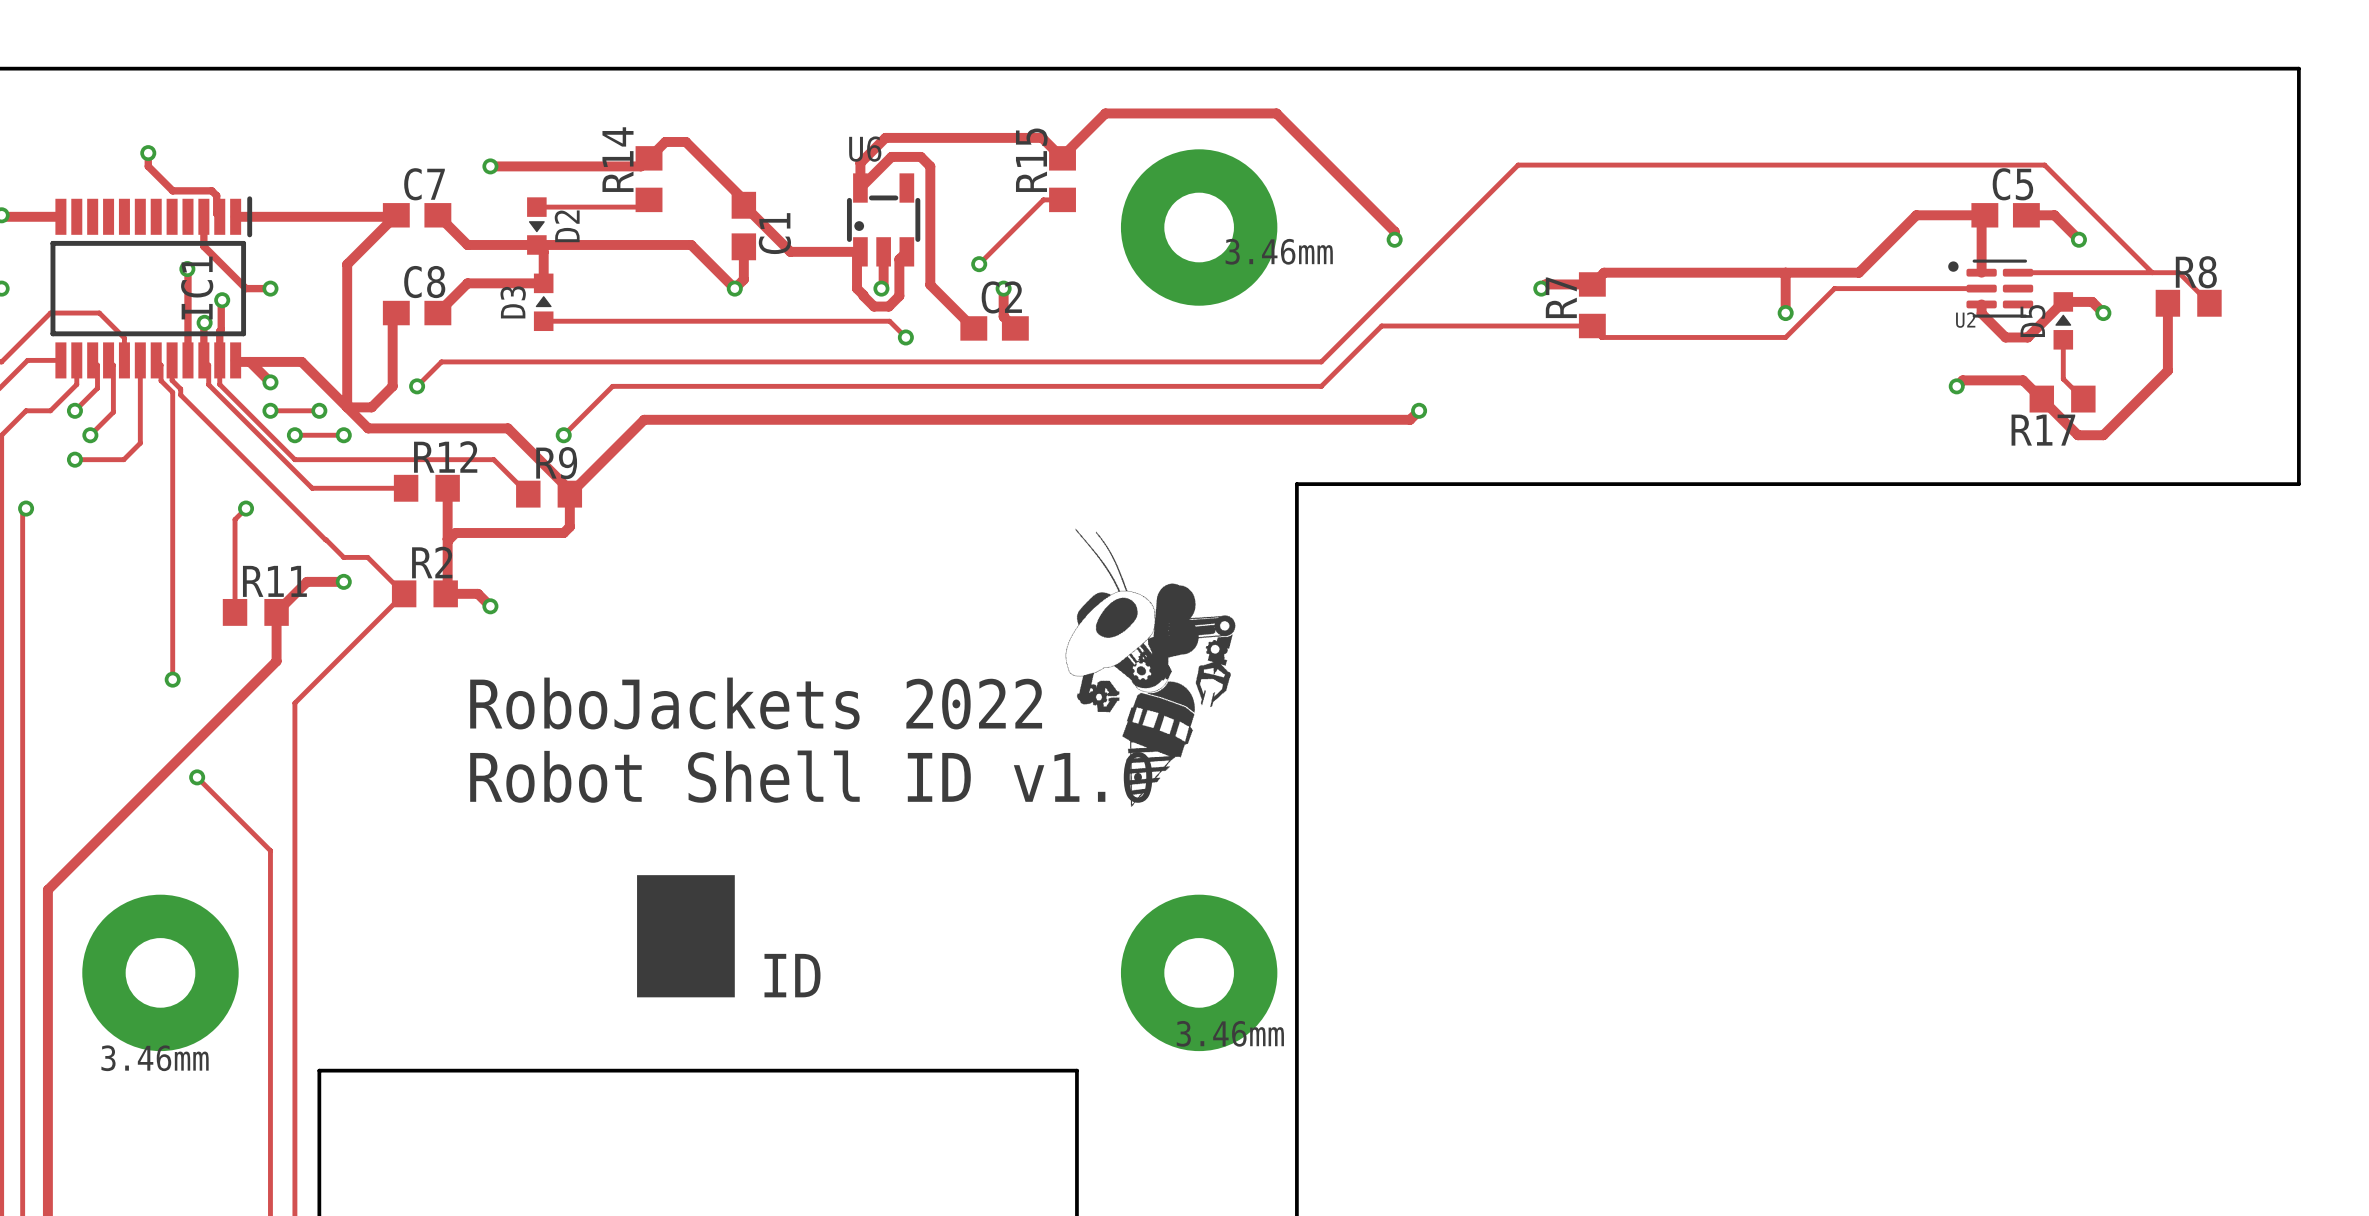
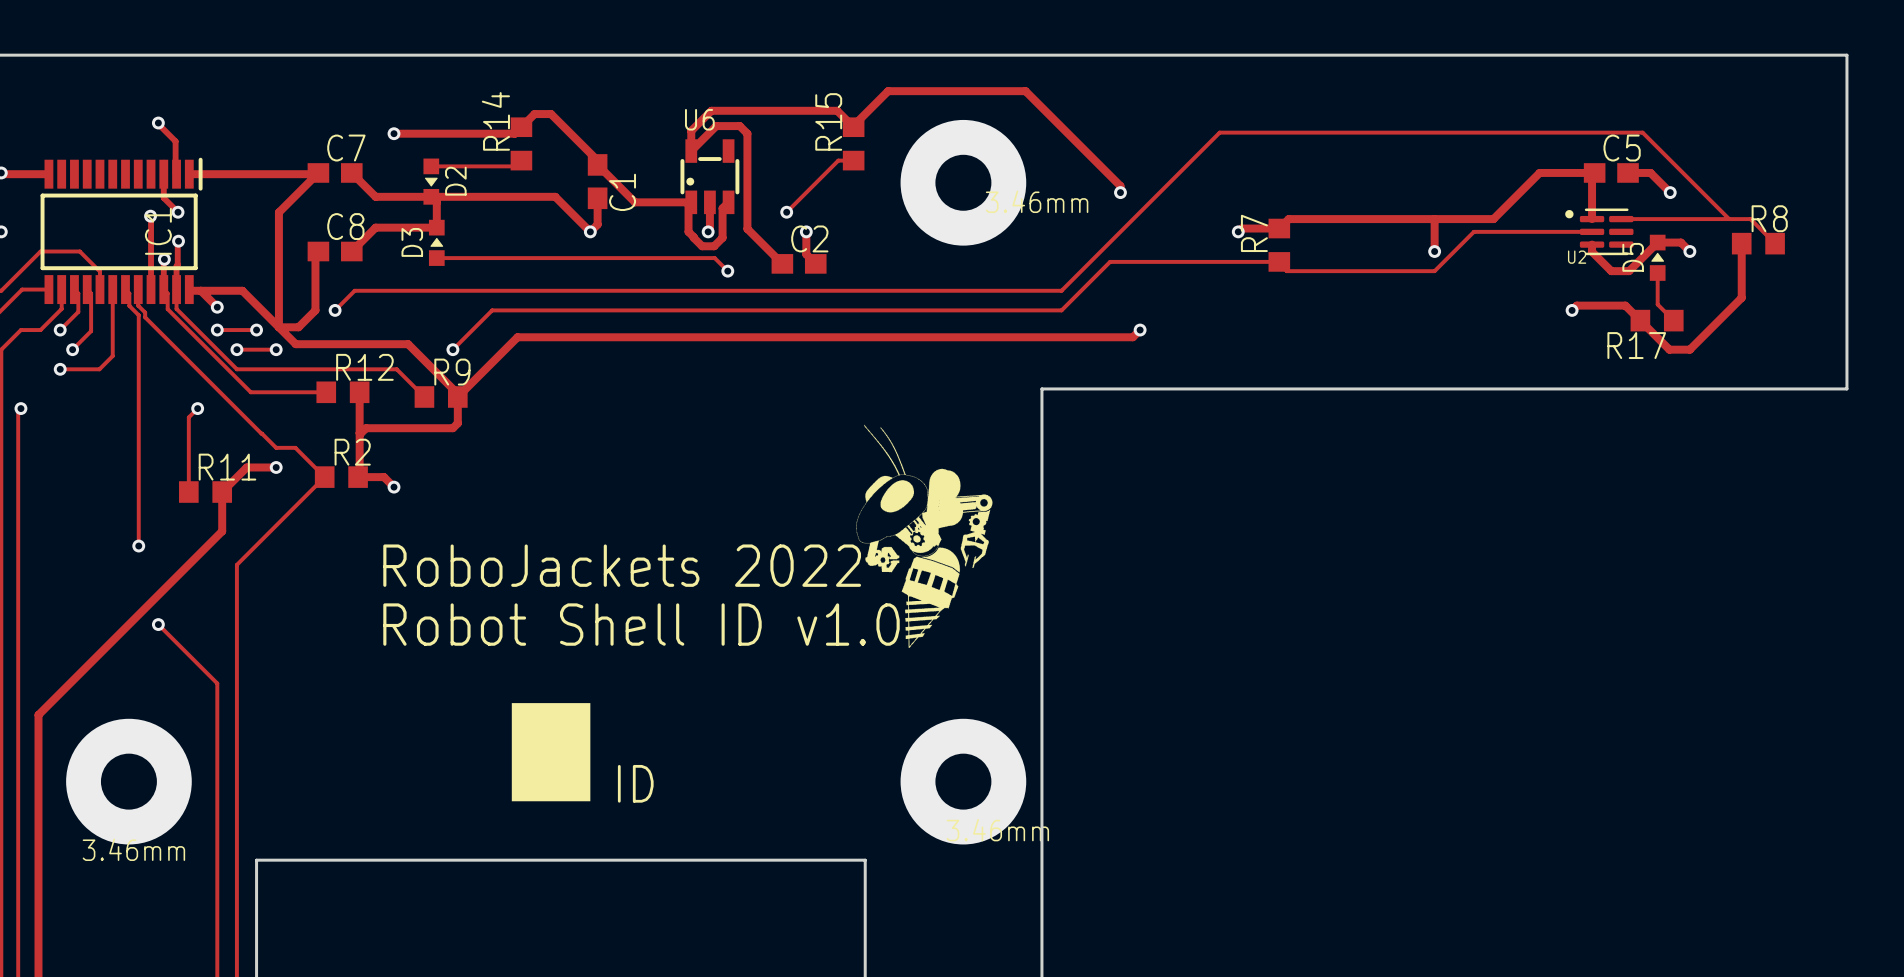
track: (148, 153) (148, 166) (172, 190) (211, 190) (216, 195) (216, 213) (218, 215) -> (158, 123) (175, 141) (175, 173)
via position: (148, 153) -> (158, 123)
track: (221, 264) (246, 288) (270, 288) -> none
via position: (270, 288) -> (178, 212)

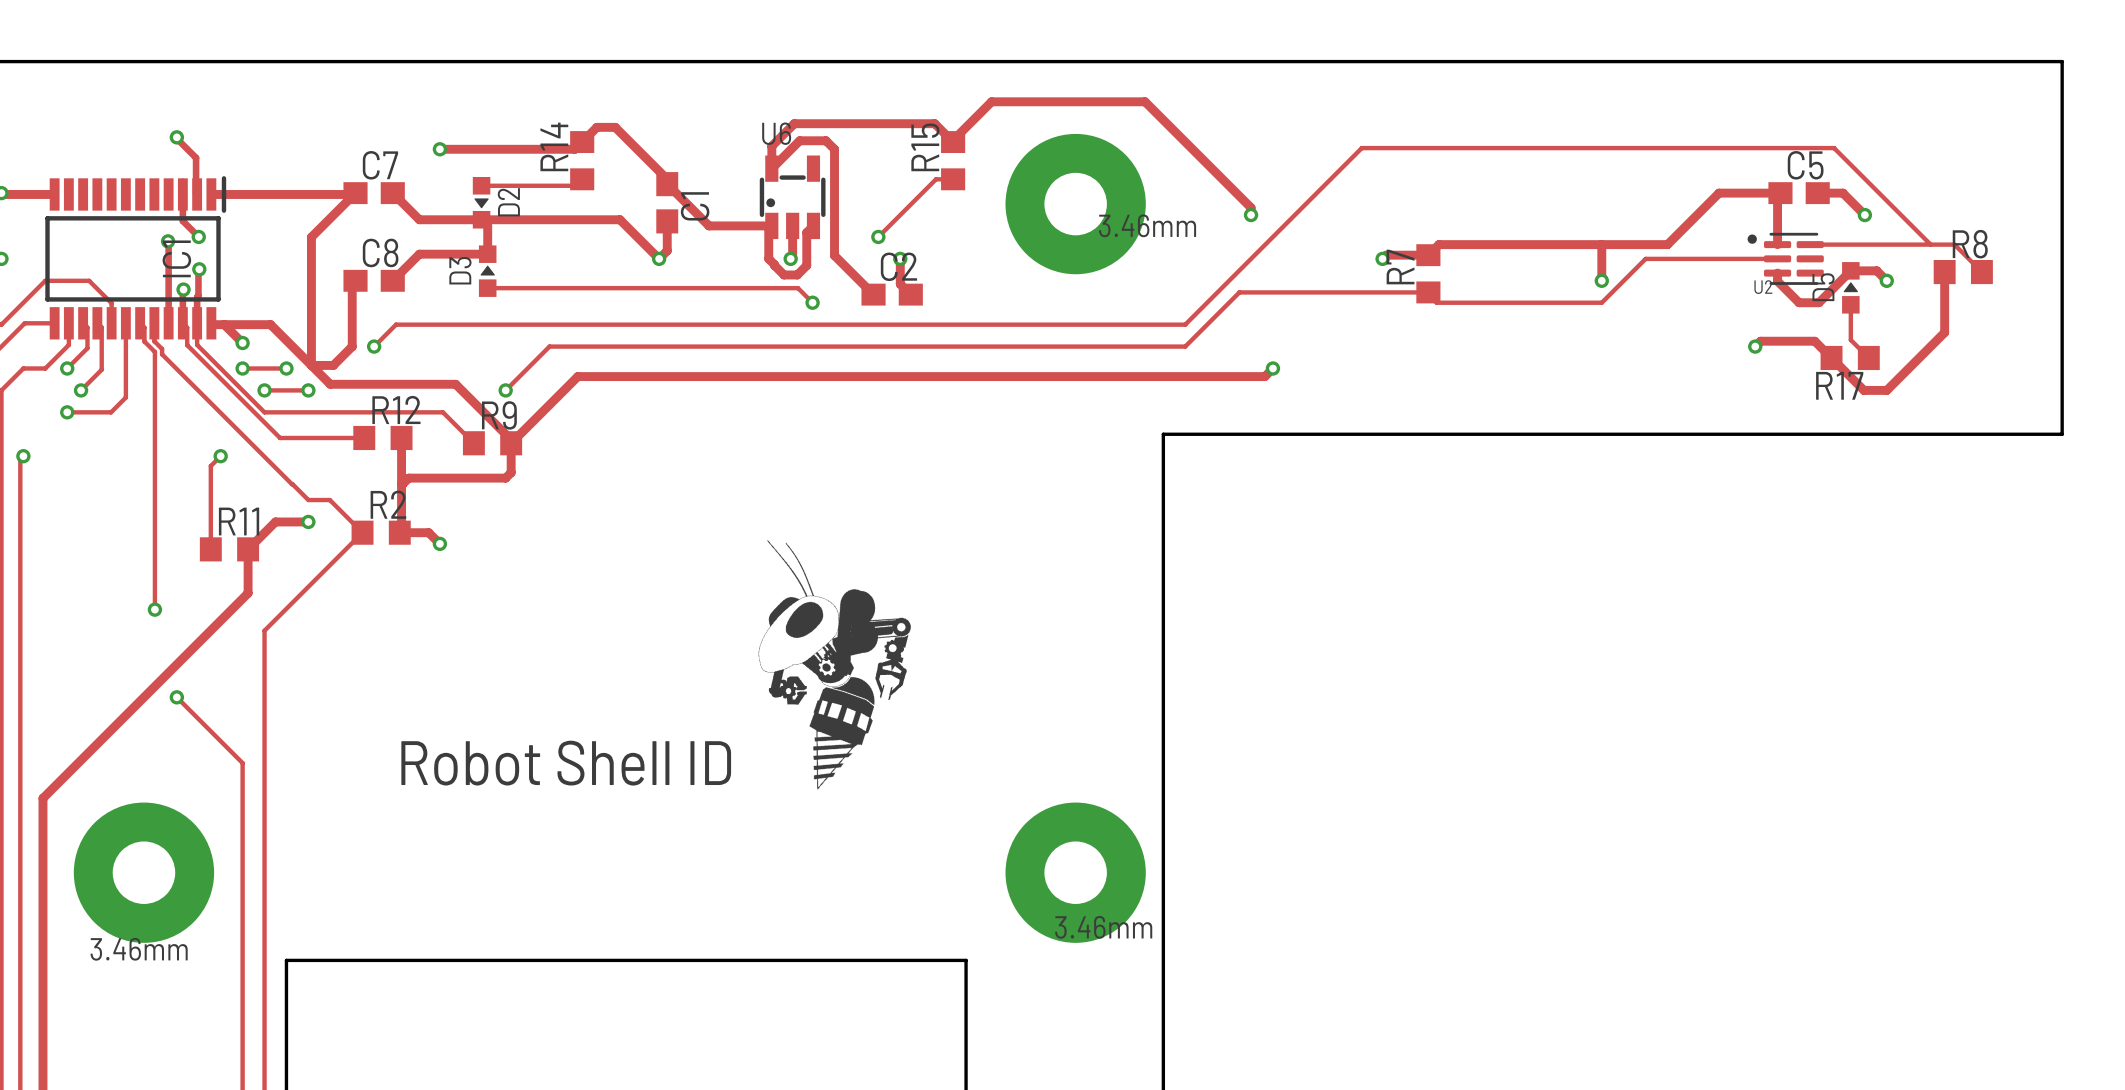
drawing position: (924, 536) -> (834, 664)
text: RoboJackets 2022 (622, 565) -> none
text: Robot Shell ID v1.0 (641, 624) -> Robot Shell ID (566, 763)
drawing: [511, 703, 591, 802] -> none
text: ID (635, 783) -> none

